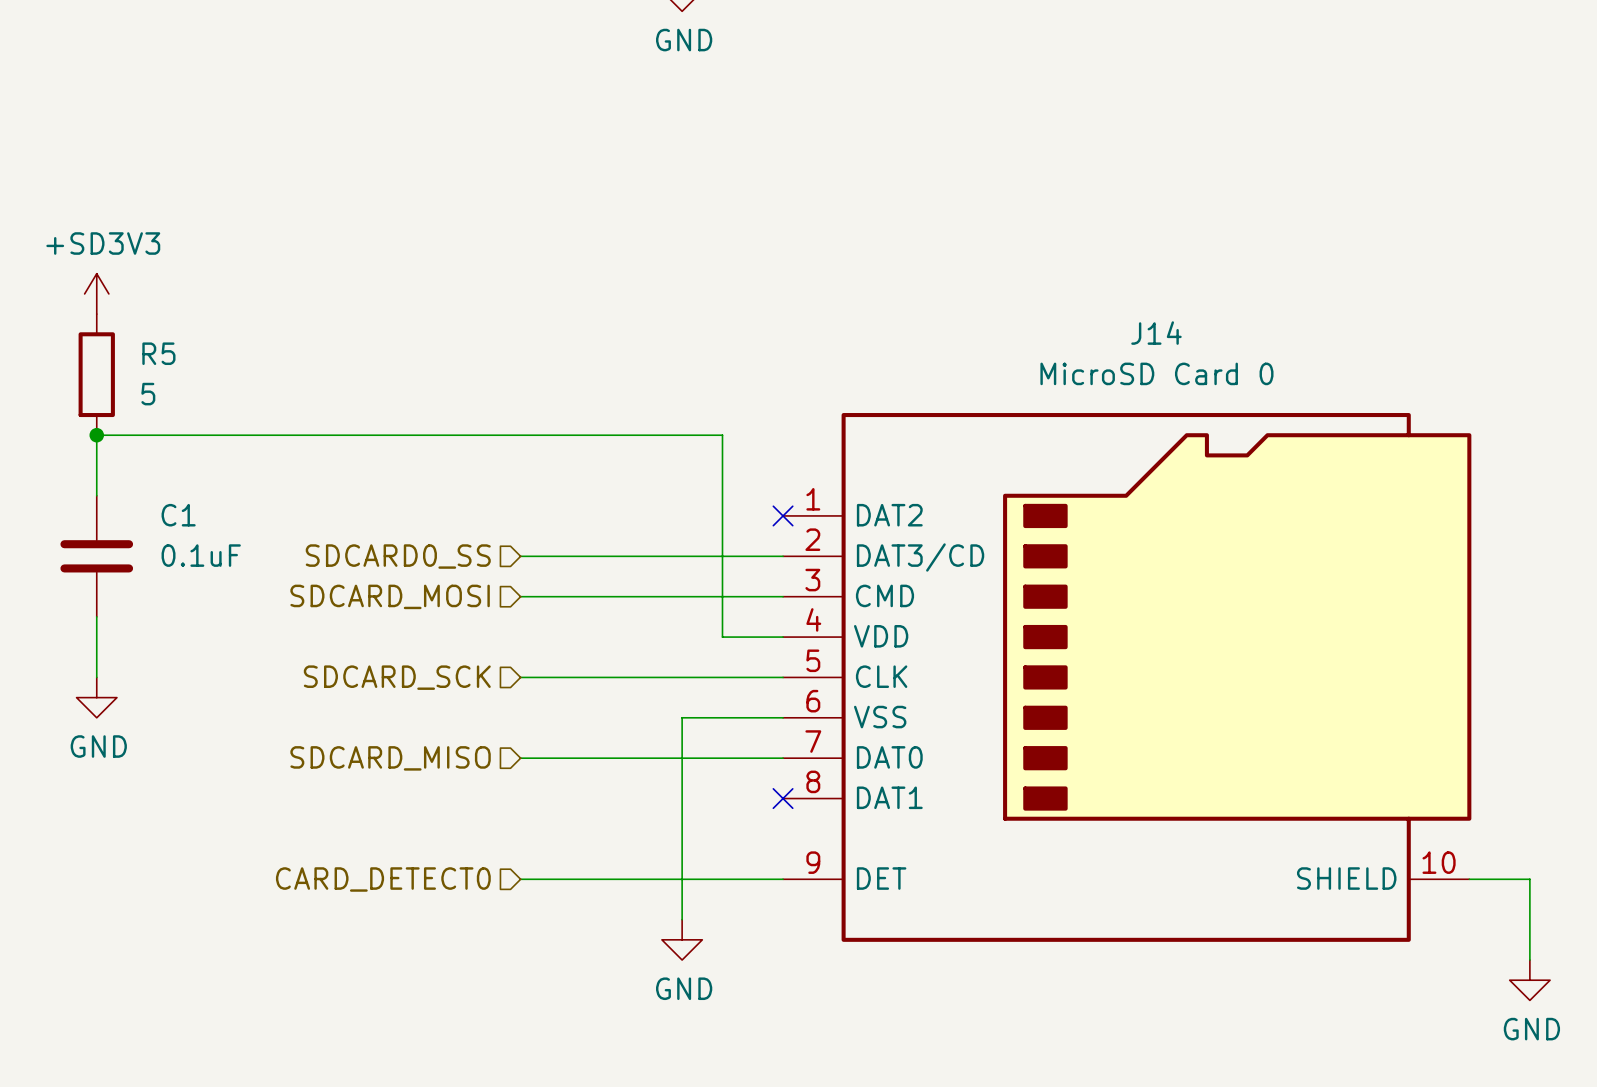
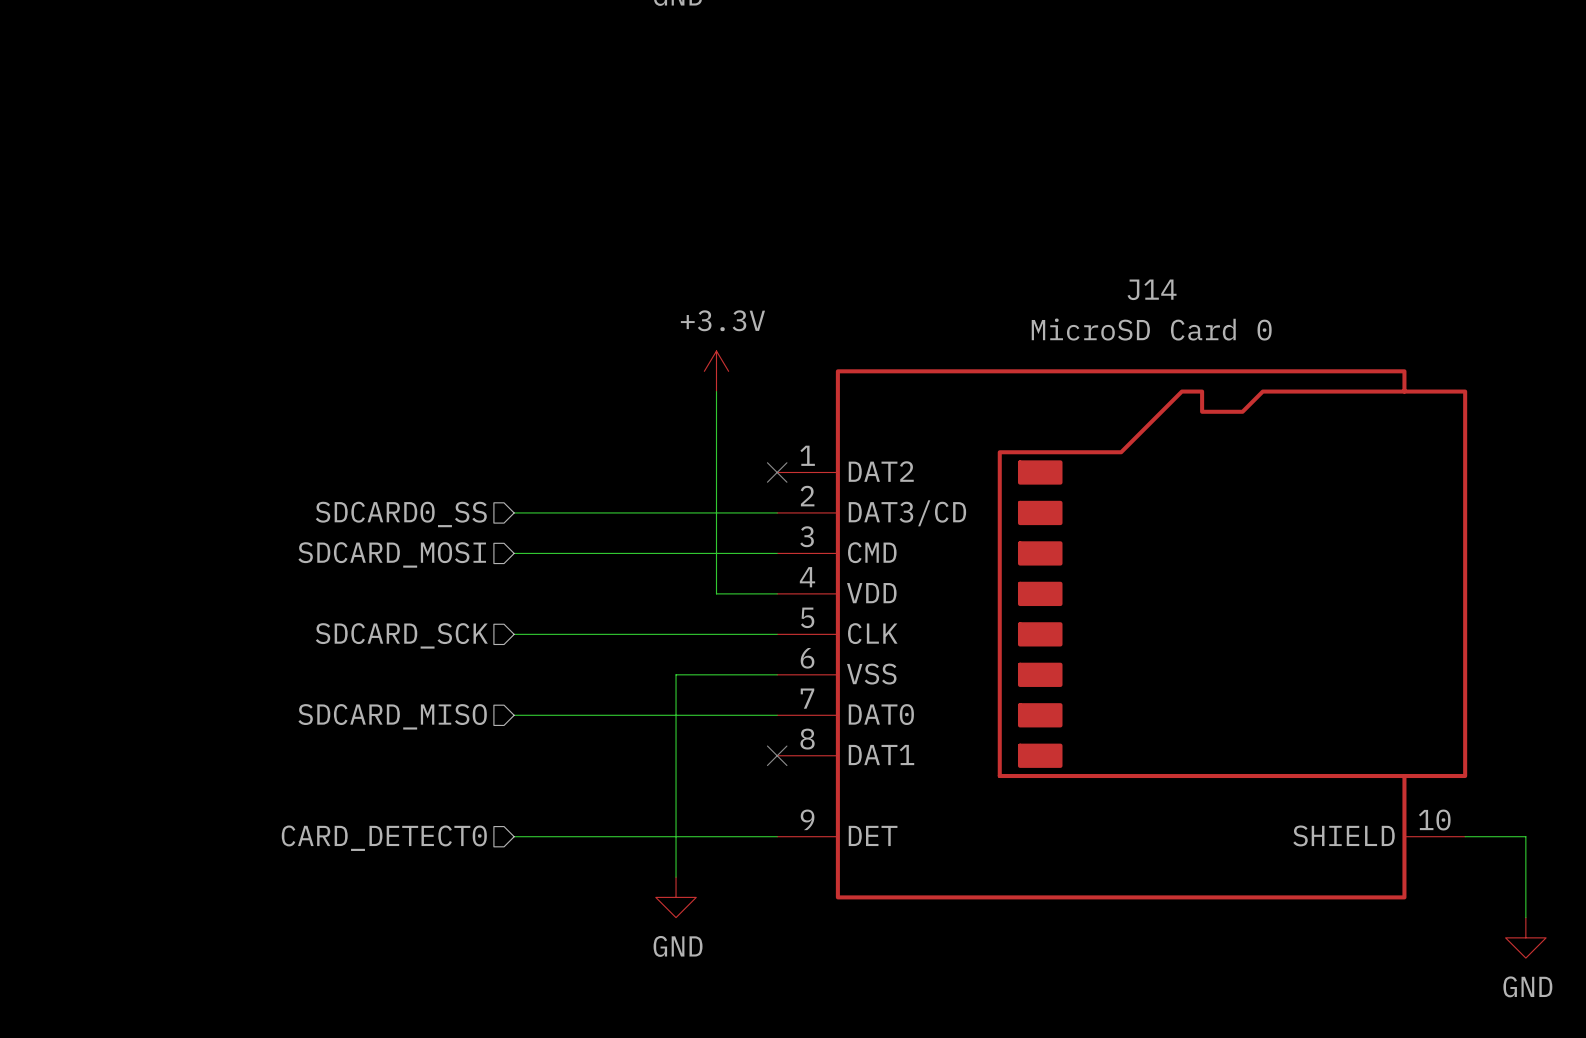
power symbol: +SD3V3 (96, 293) -> none
R5: 5 (96, 374) -> none
power symbol: none -> +3.3V (716, 371)
junction: (96, 435) -> none
wire: (722, 435) (96, 435) (96, 495) -> none
C1: 0.1uF (96, 556) -> none
wire: (96, 616) (96, 677) -> none
power symbol: GND (96, 697) -> none

